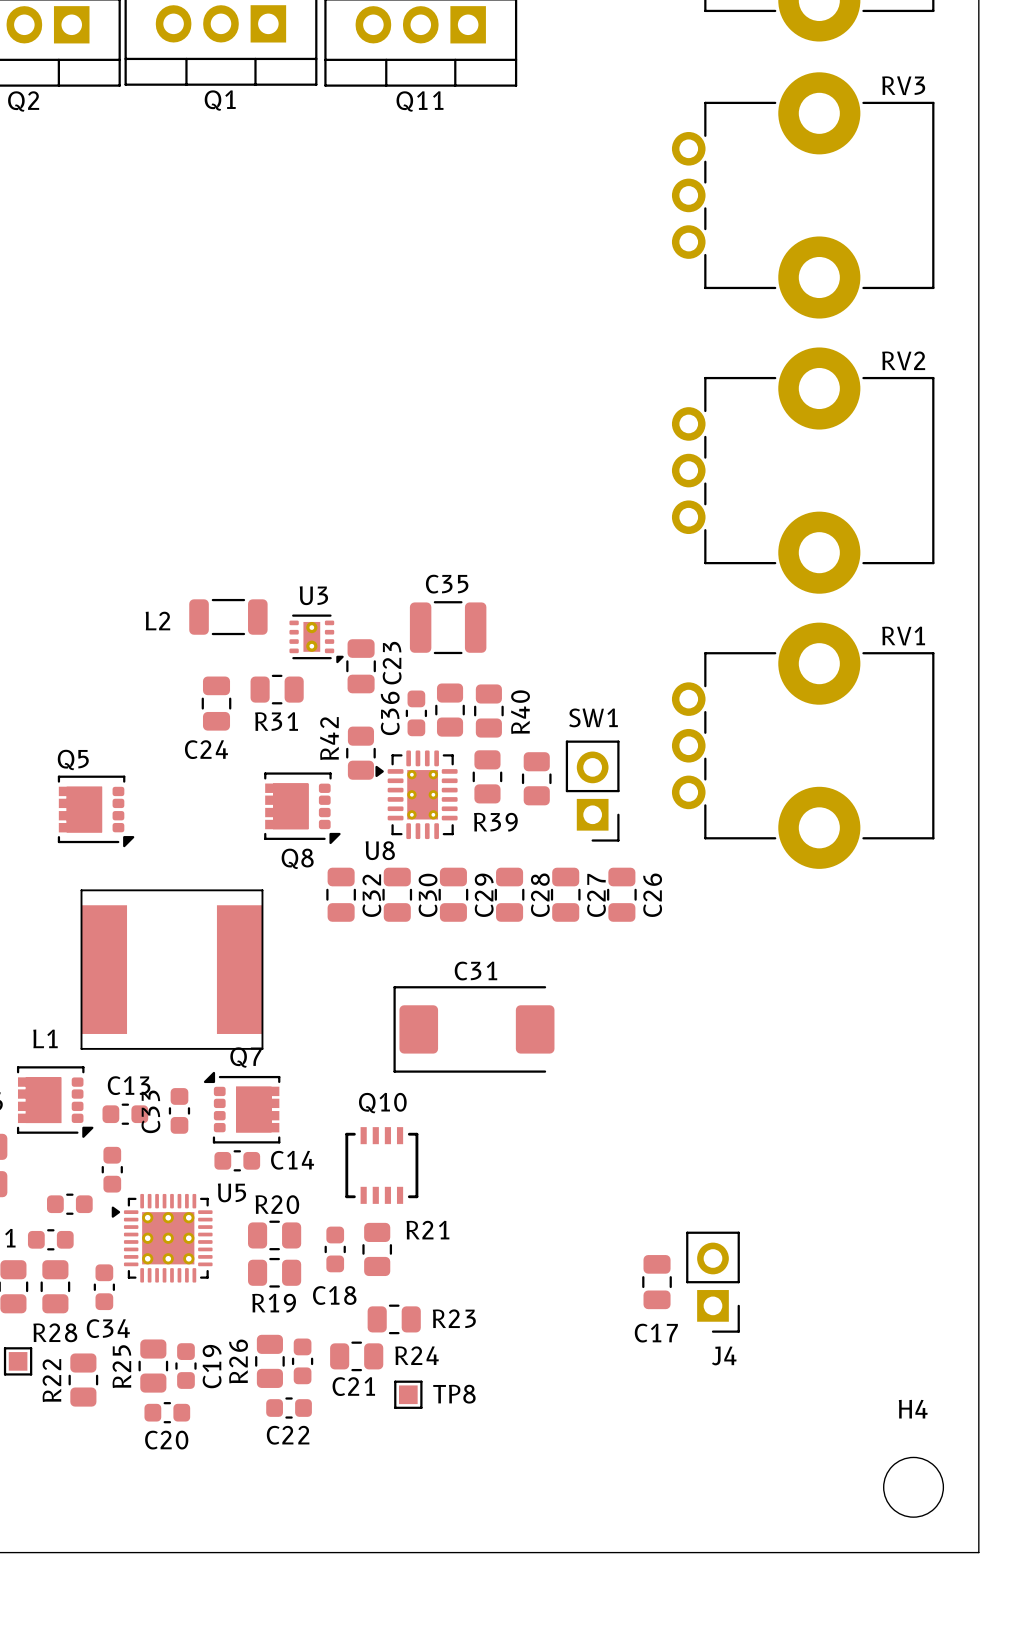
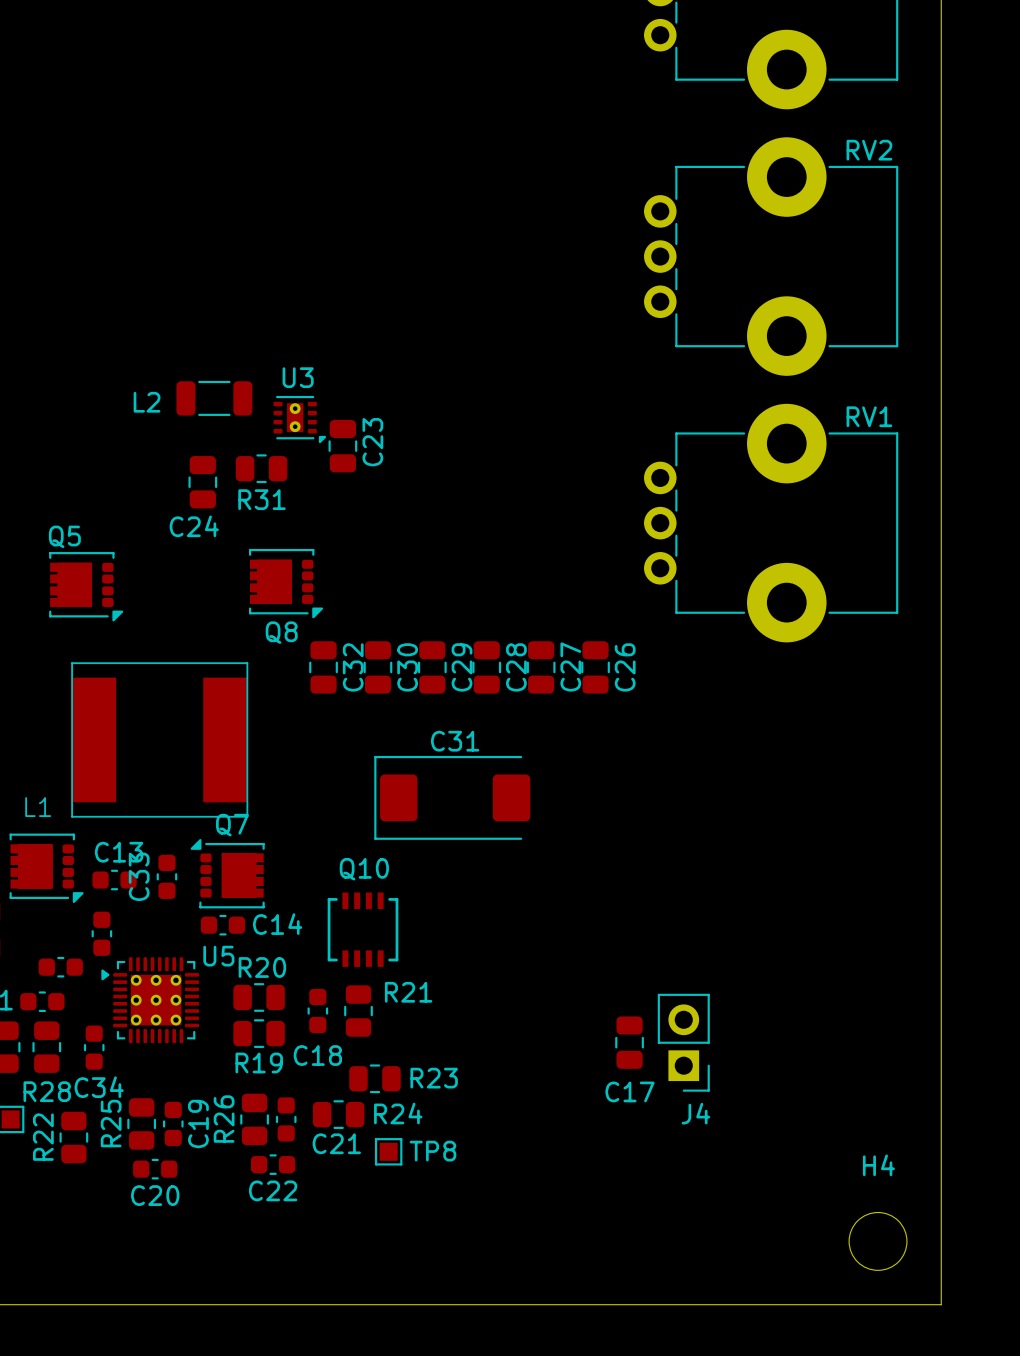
C35: (448, 627) -> none
part: (450, 710) -> none
R40: (488, 711) -> none
C36: (416, 713) -> none
R42: (360, 753) -> none
R39: (487, 776) -> none
part: (536, 778) -> none
SW1: (592, 791) -> none
U8: (416, 794) -> none

